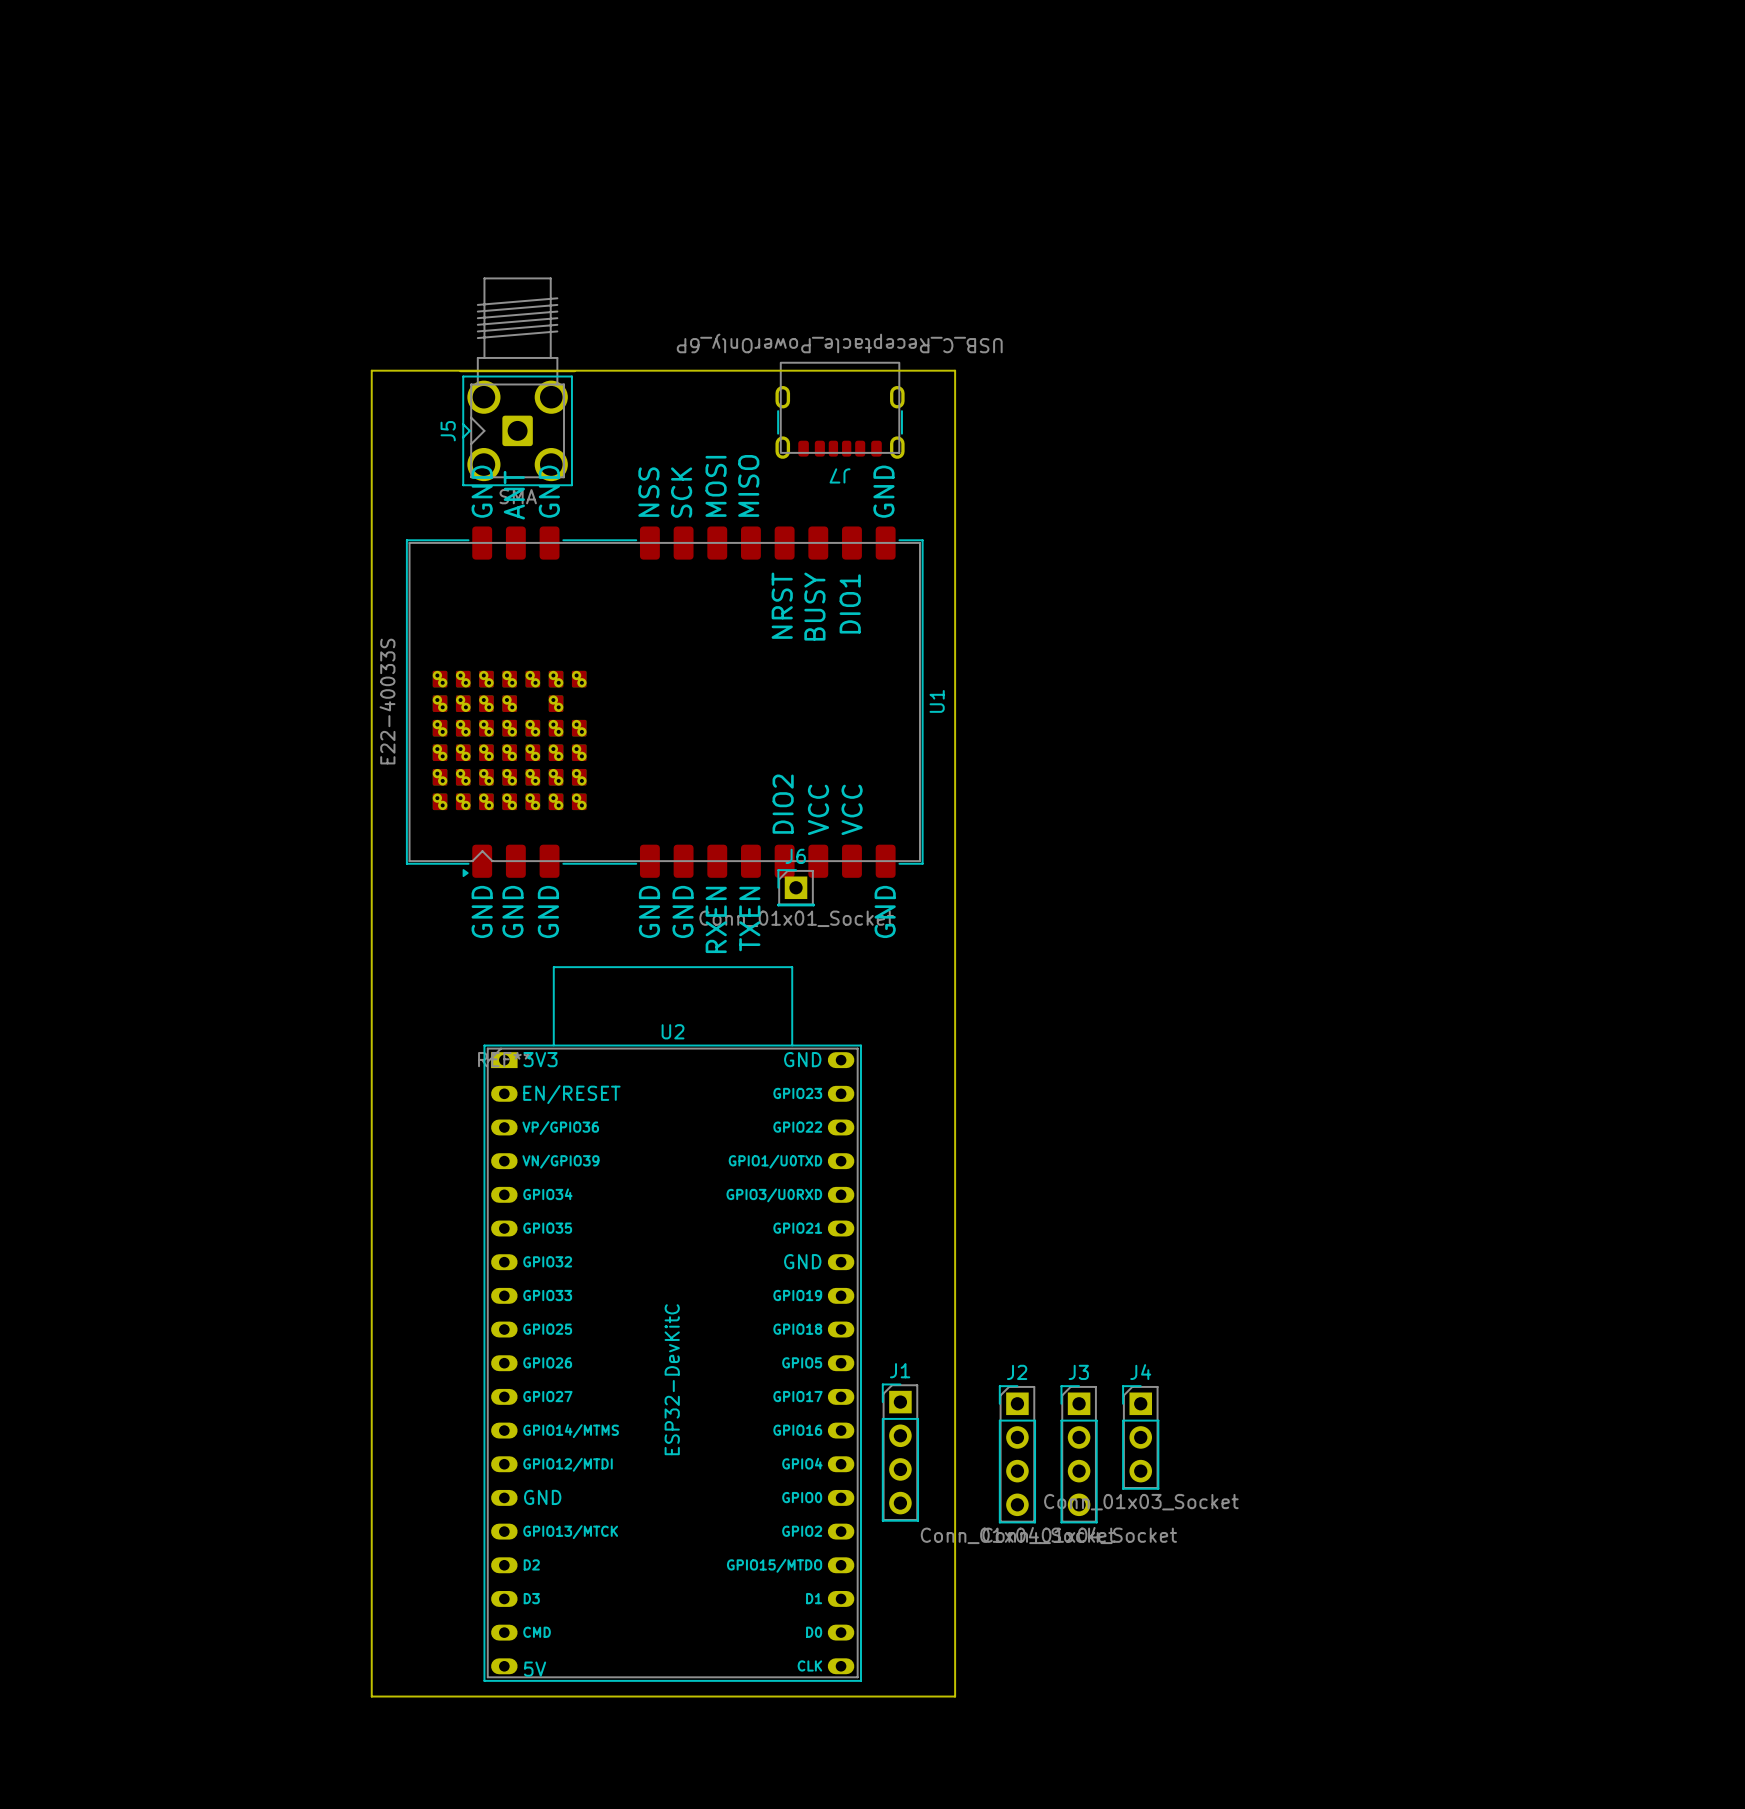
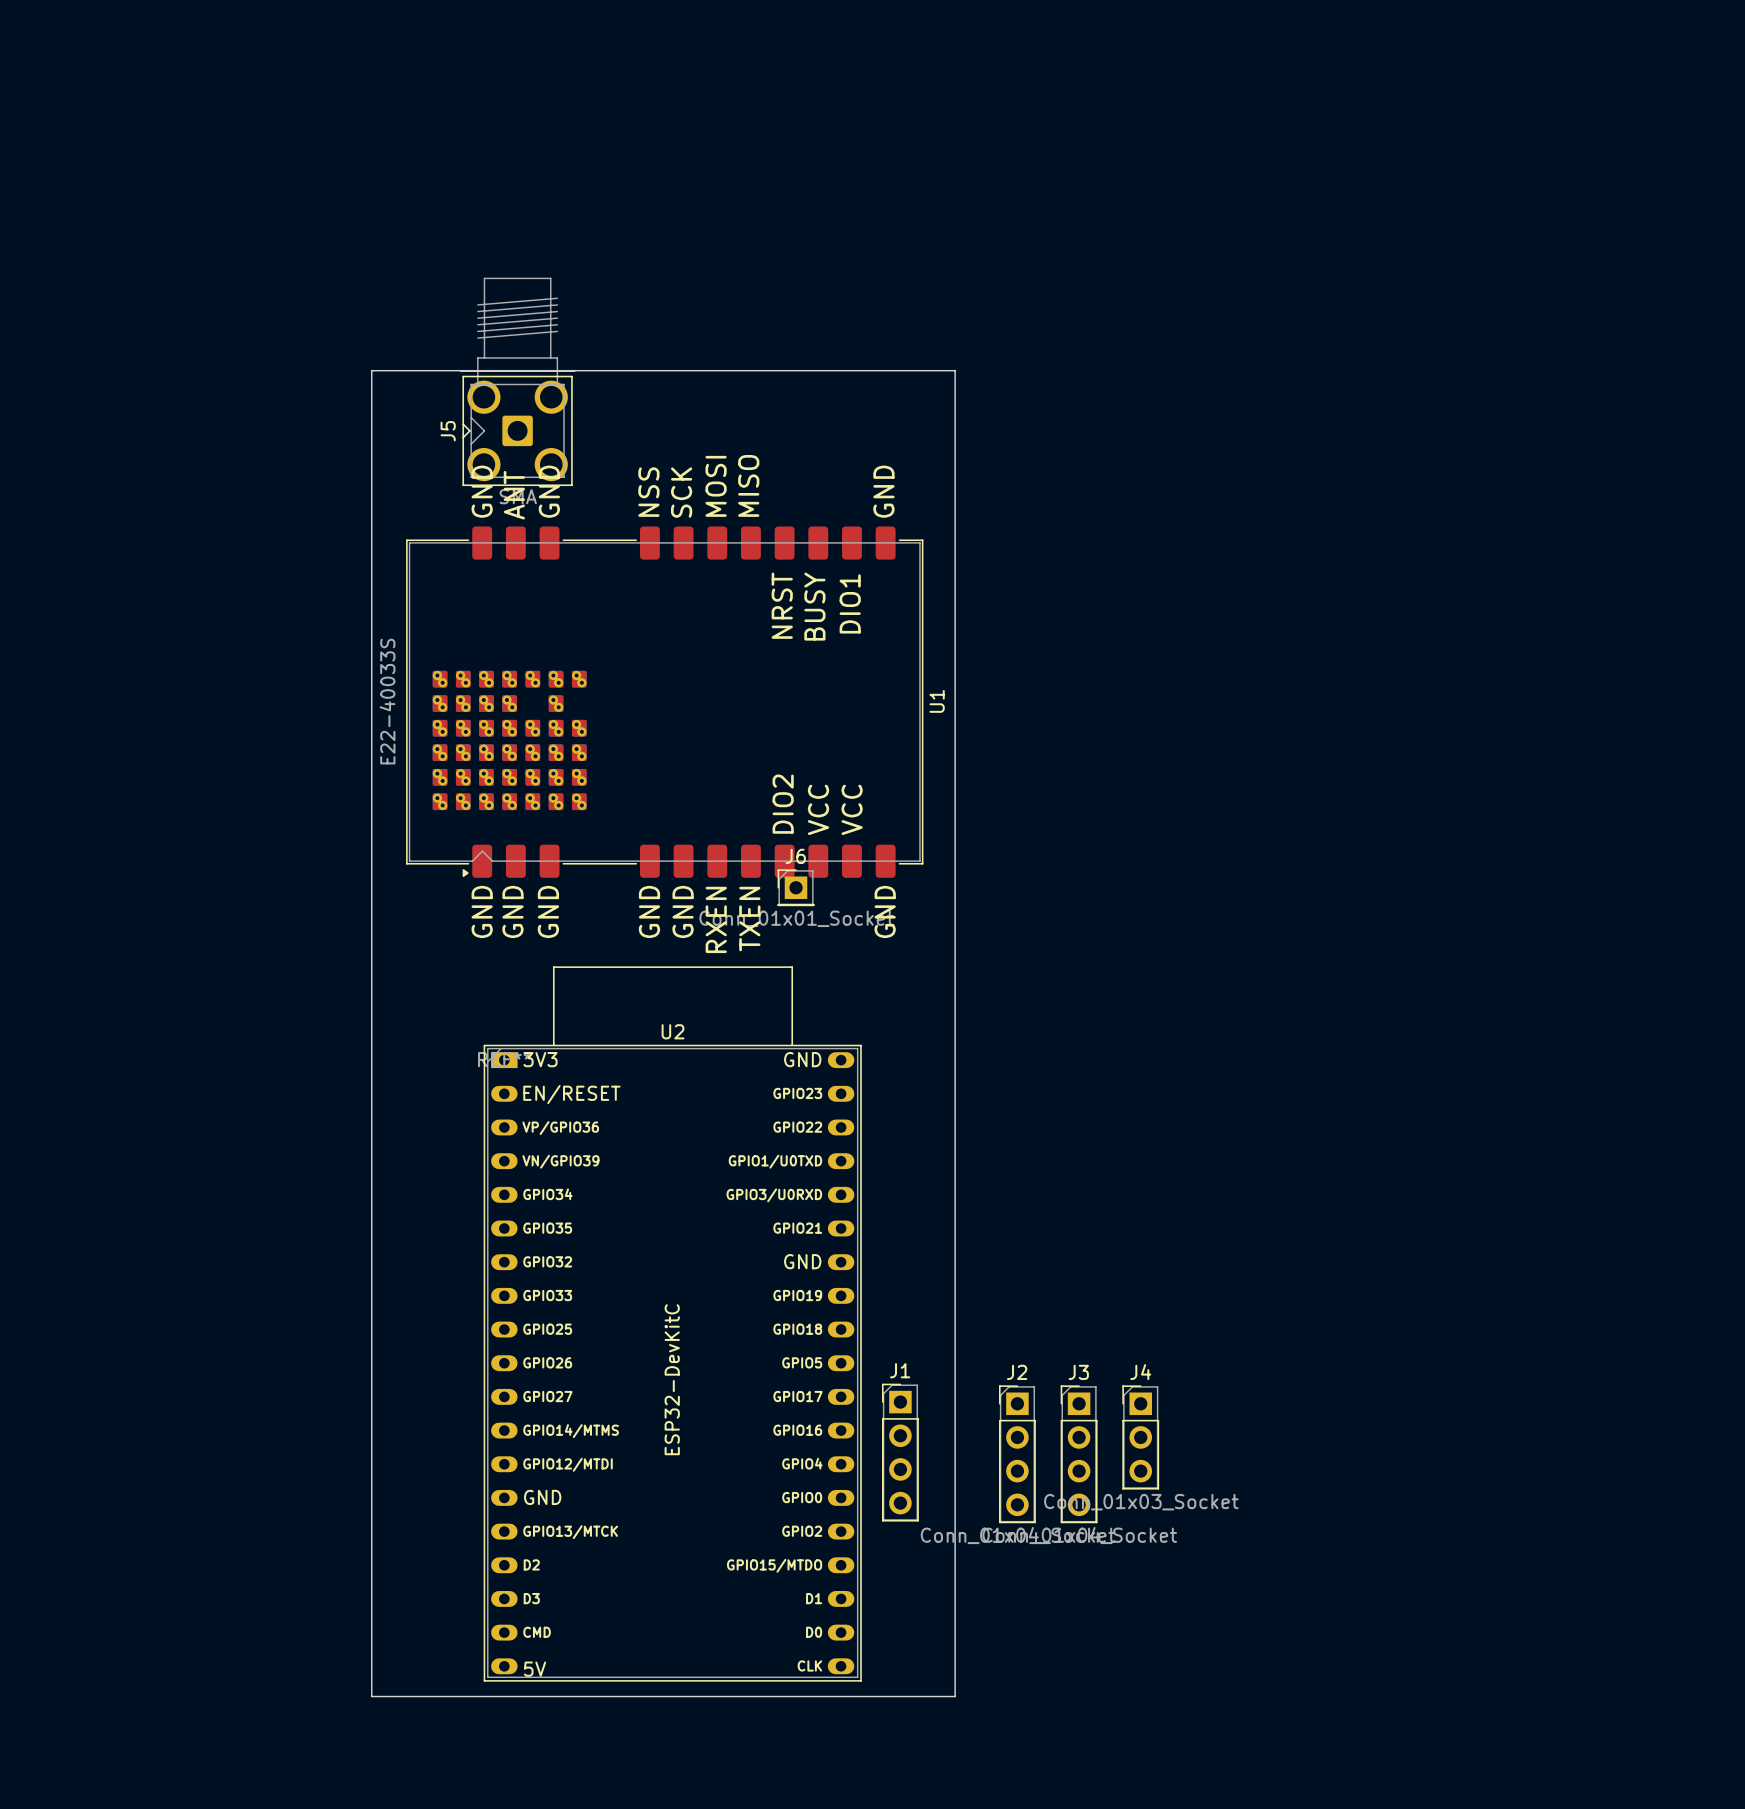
J7: USB_C_Receptacle_PowerOnly_6P (840, 410) -> none

